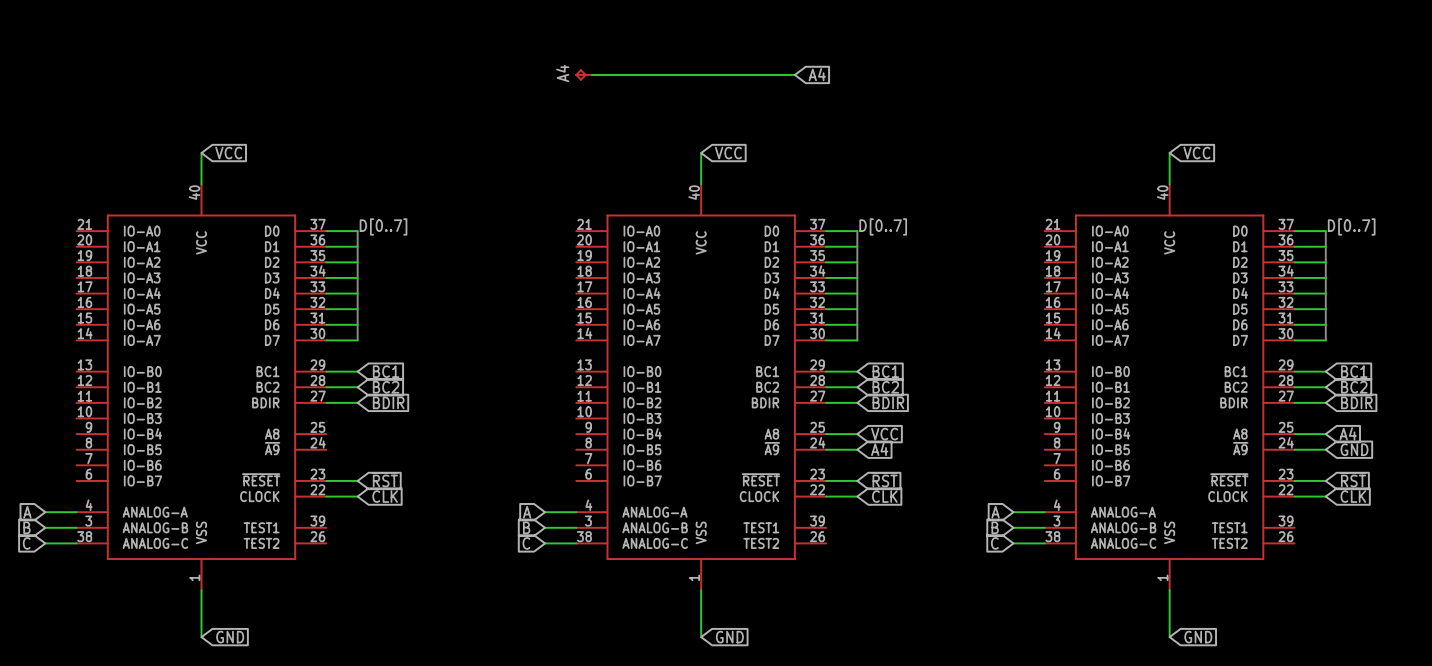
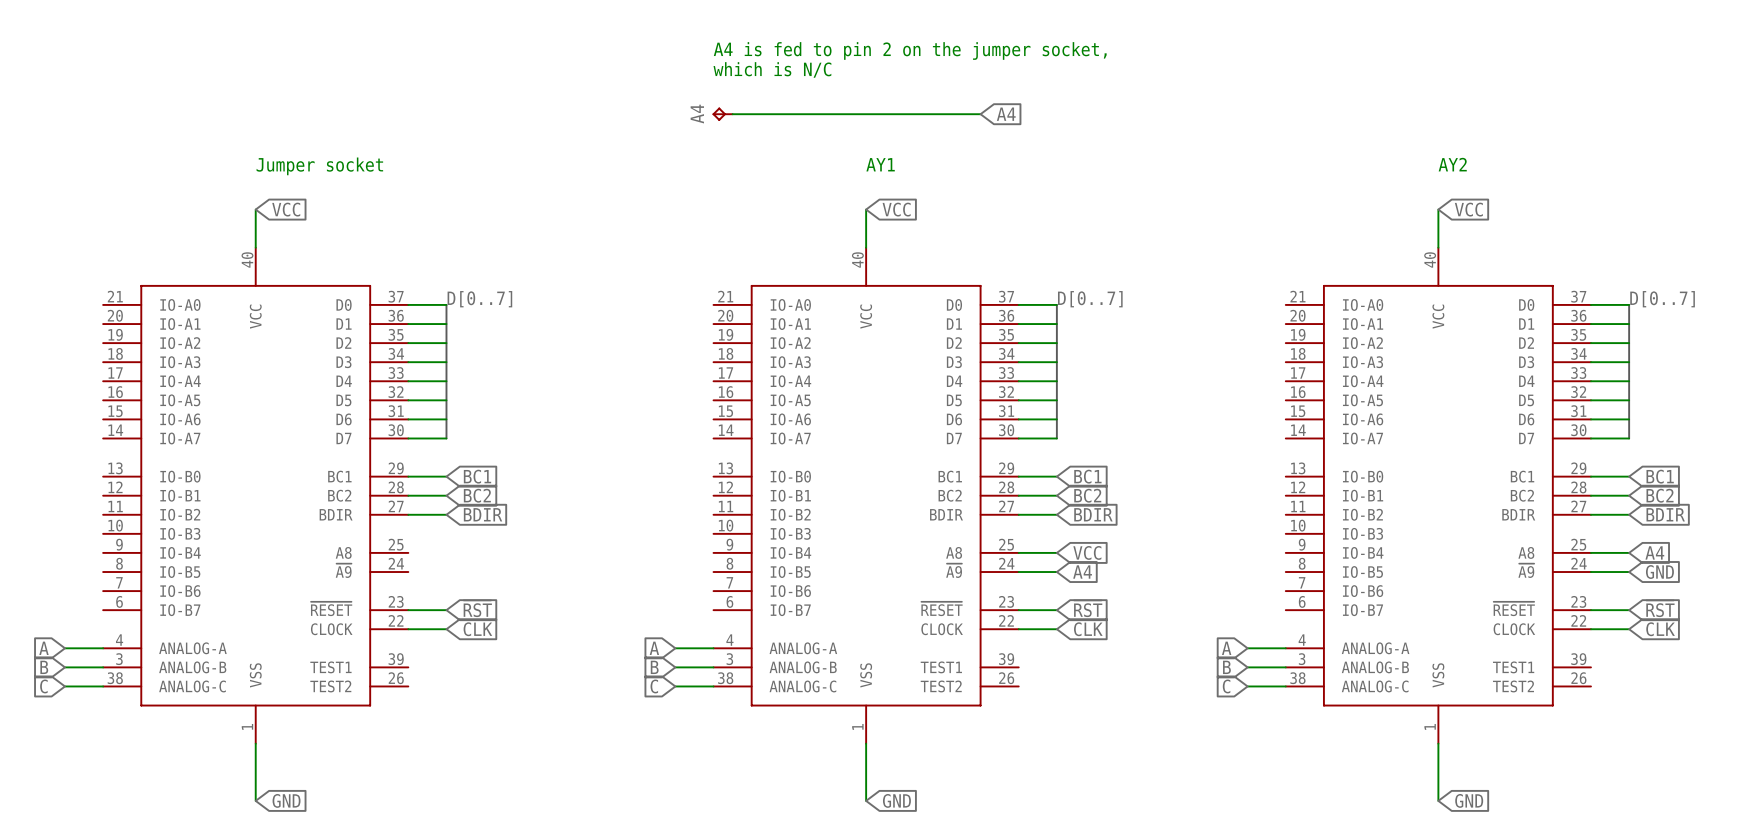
text: none -> A4 is fed to pin 2 on the jumper socket, (910, 50)
text: none -> which is N/C (772, 69)
text: none -> AY1 (880, 164)
text: none -> AY2 (1452, 164)
text: none -> Jumper socket (319, 166)

